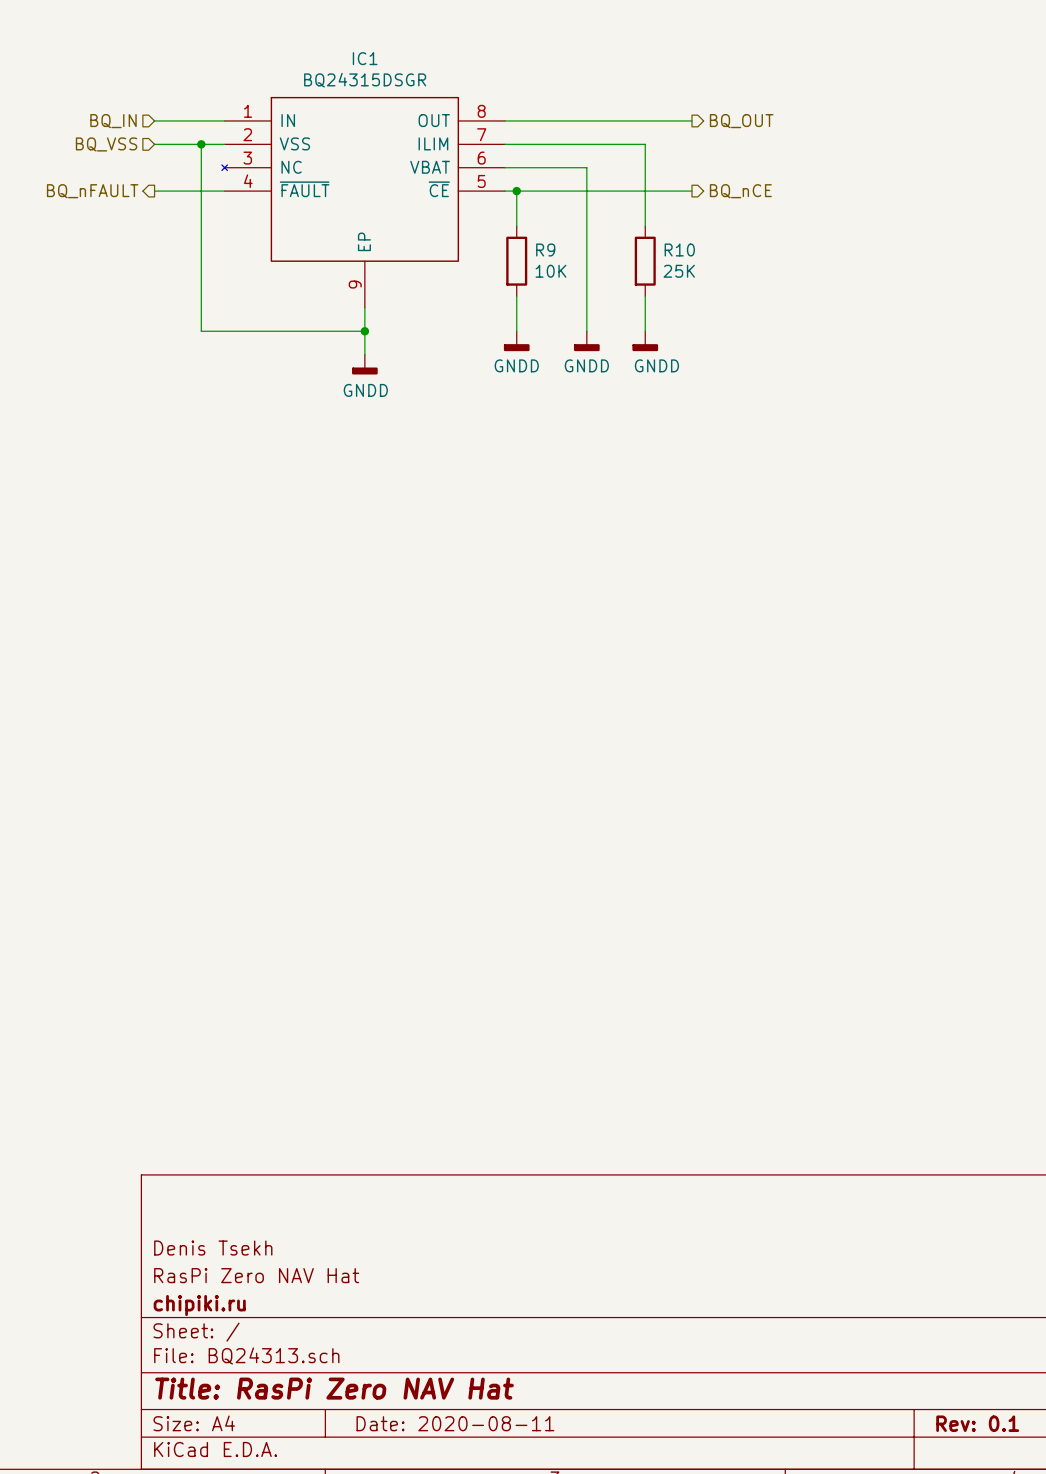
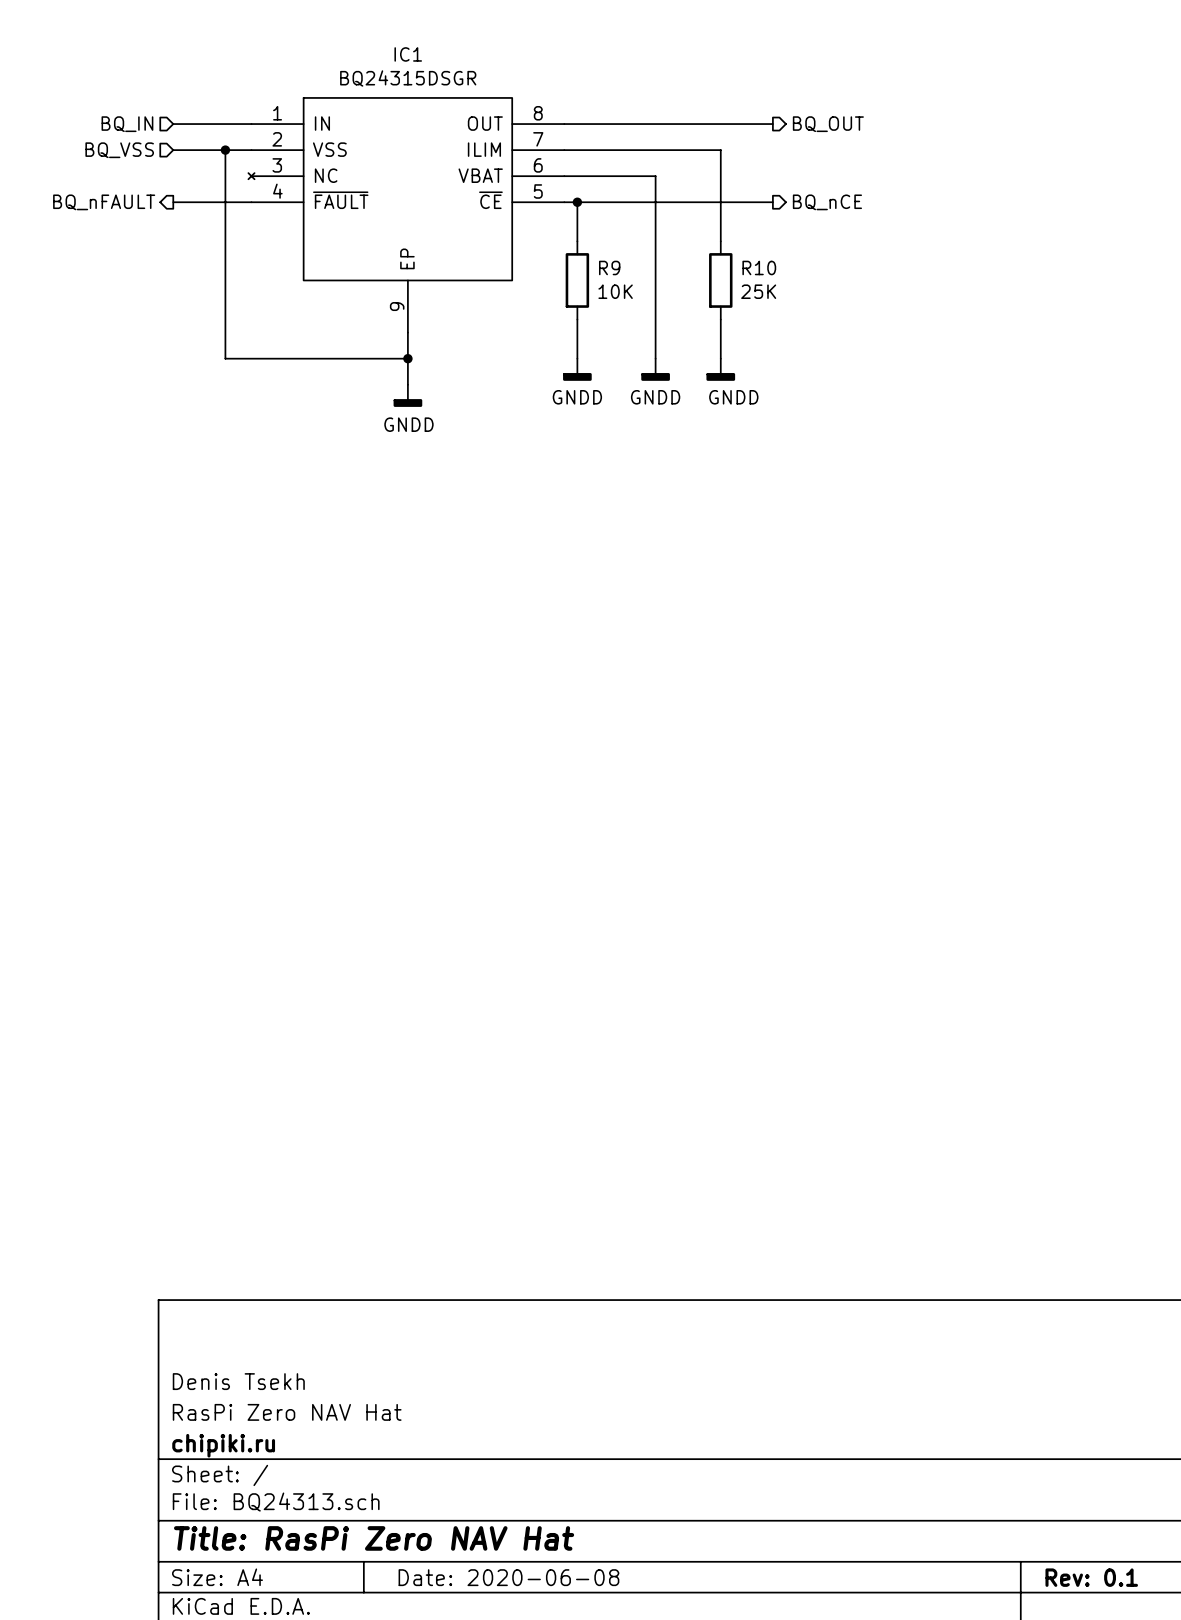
title block: Date: 2020-08-11 (455, 1423) -> Date: 2020-06-08 (508, 1577)

